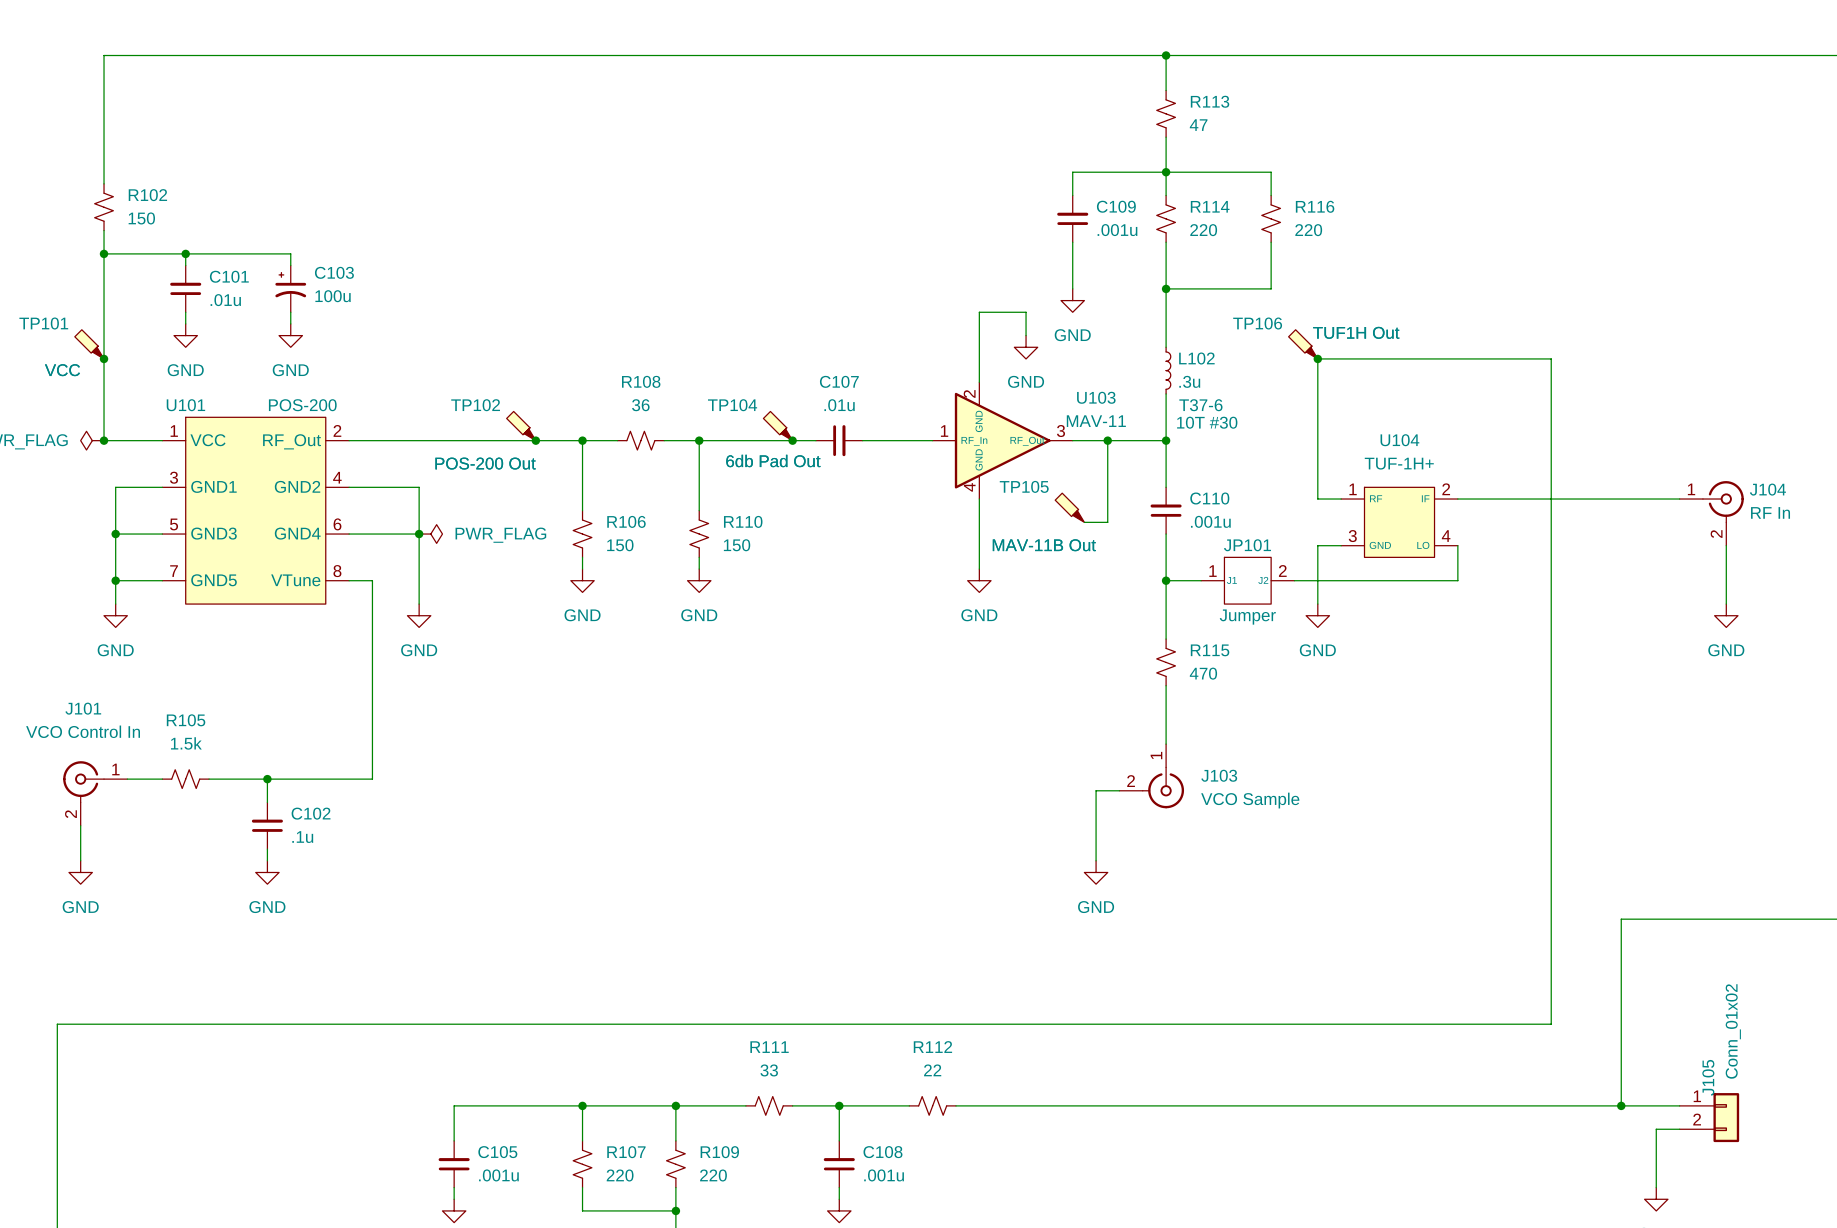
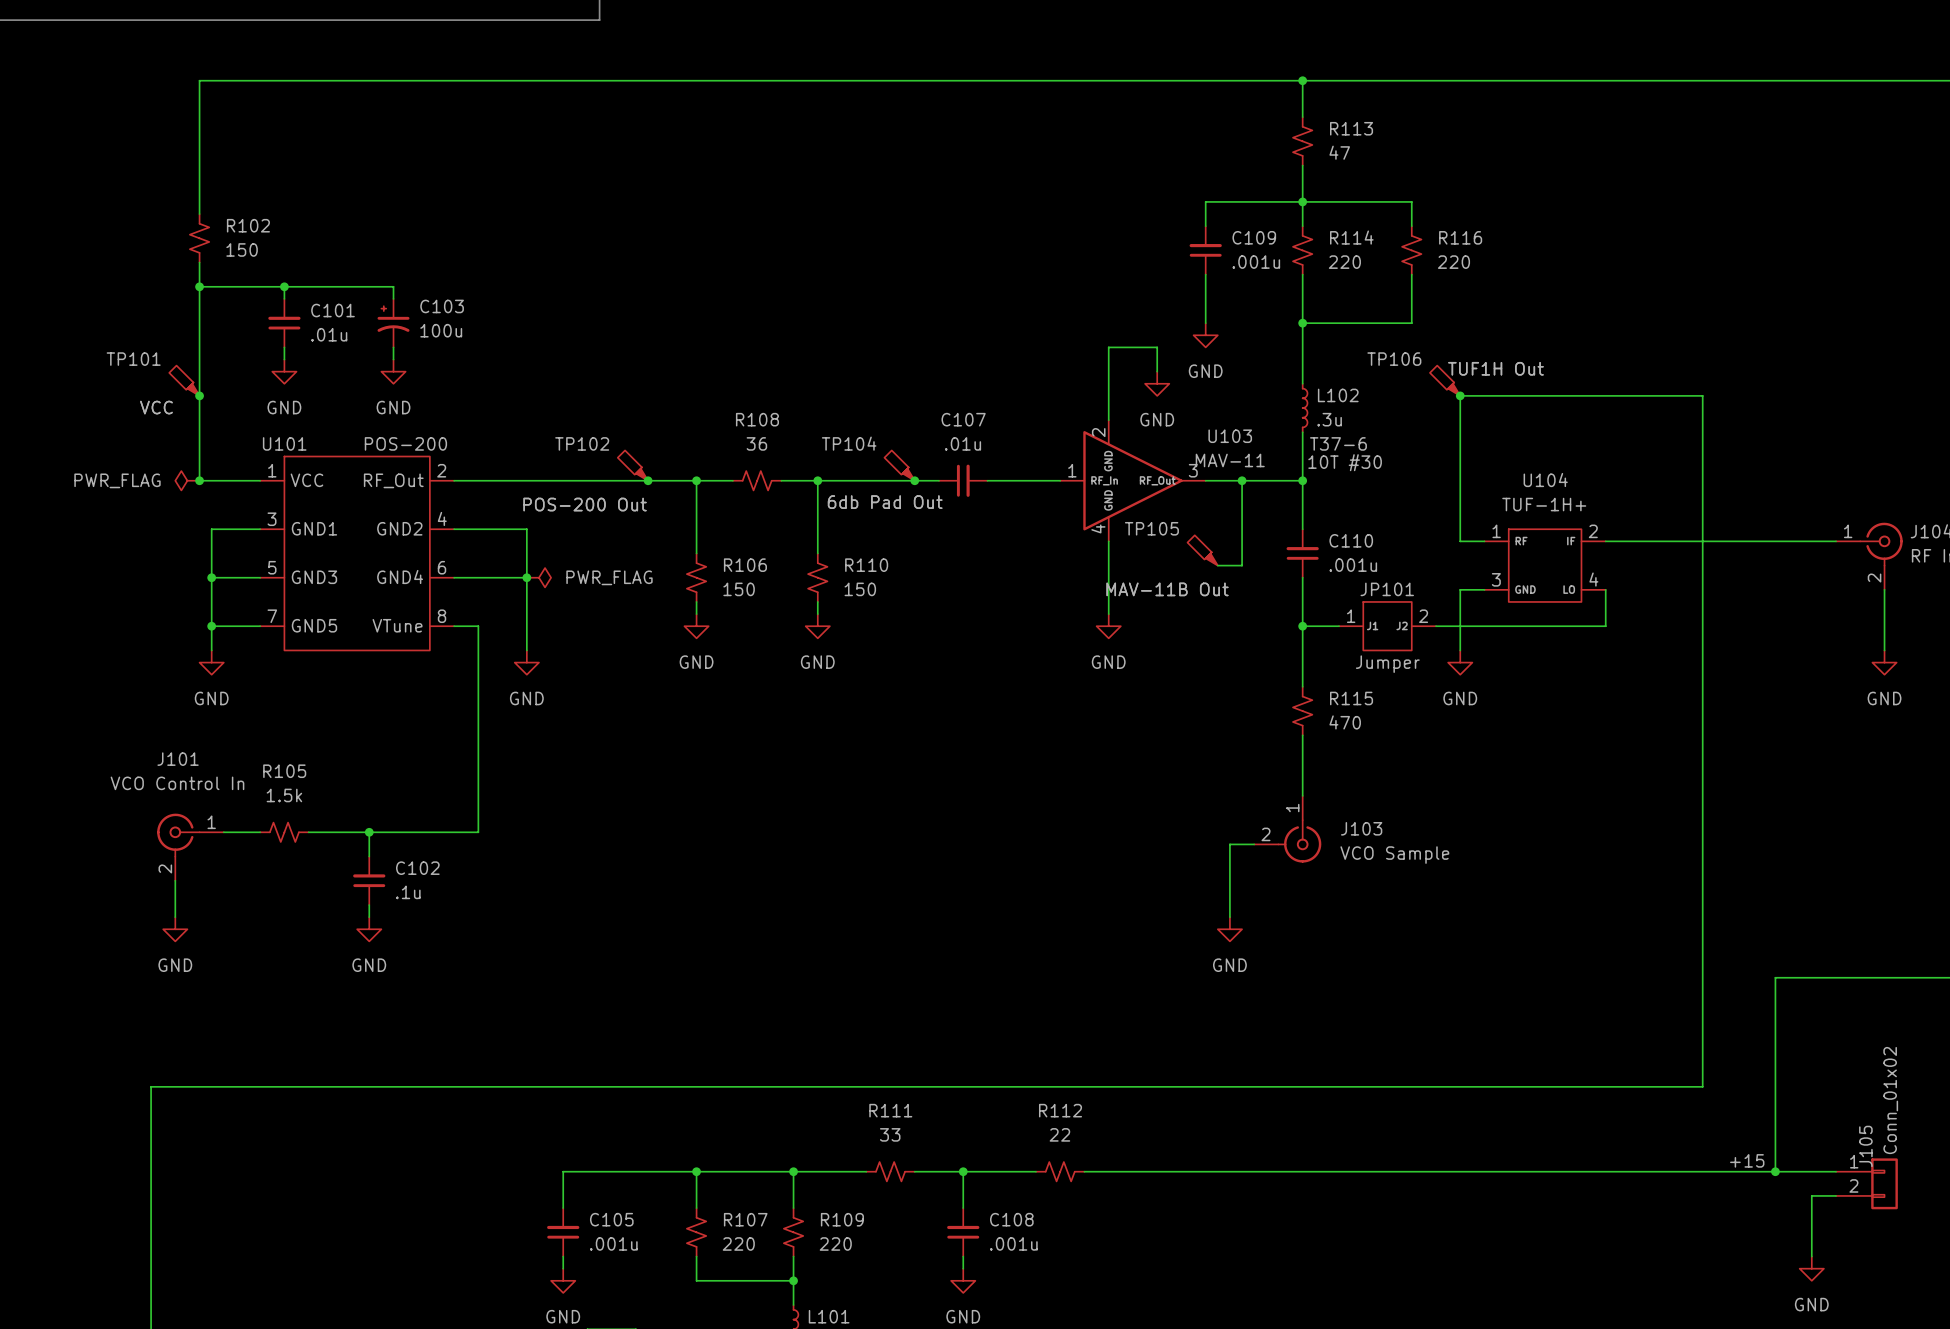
label: none -> +15 (1747, 1160)

